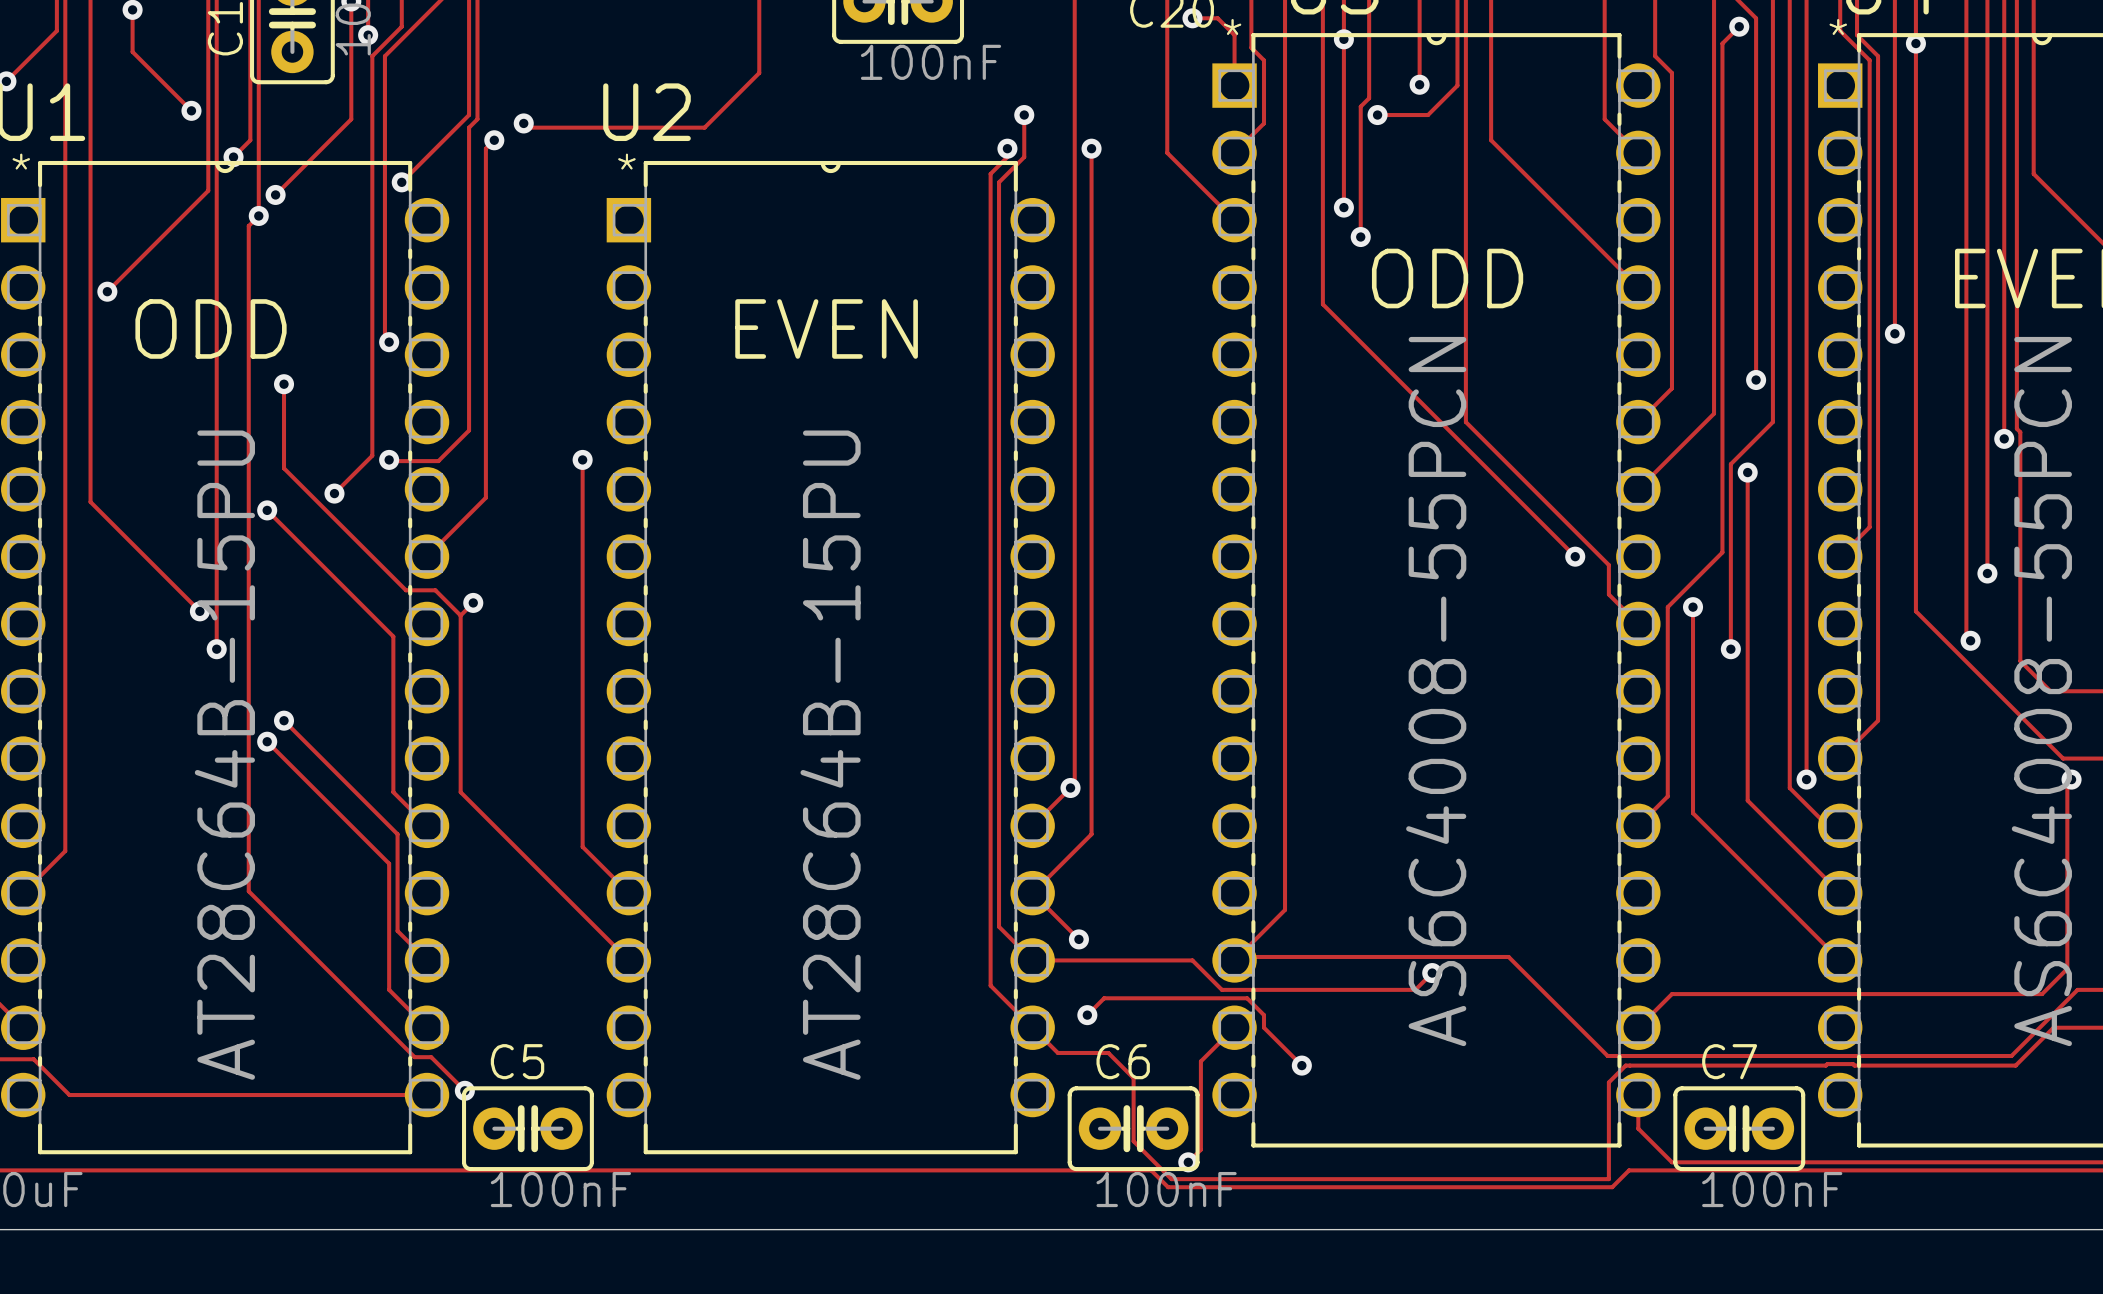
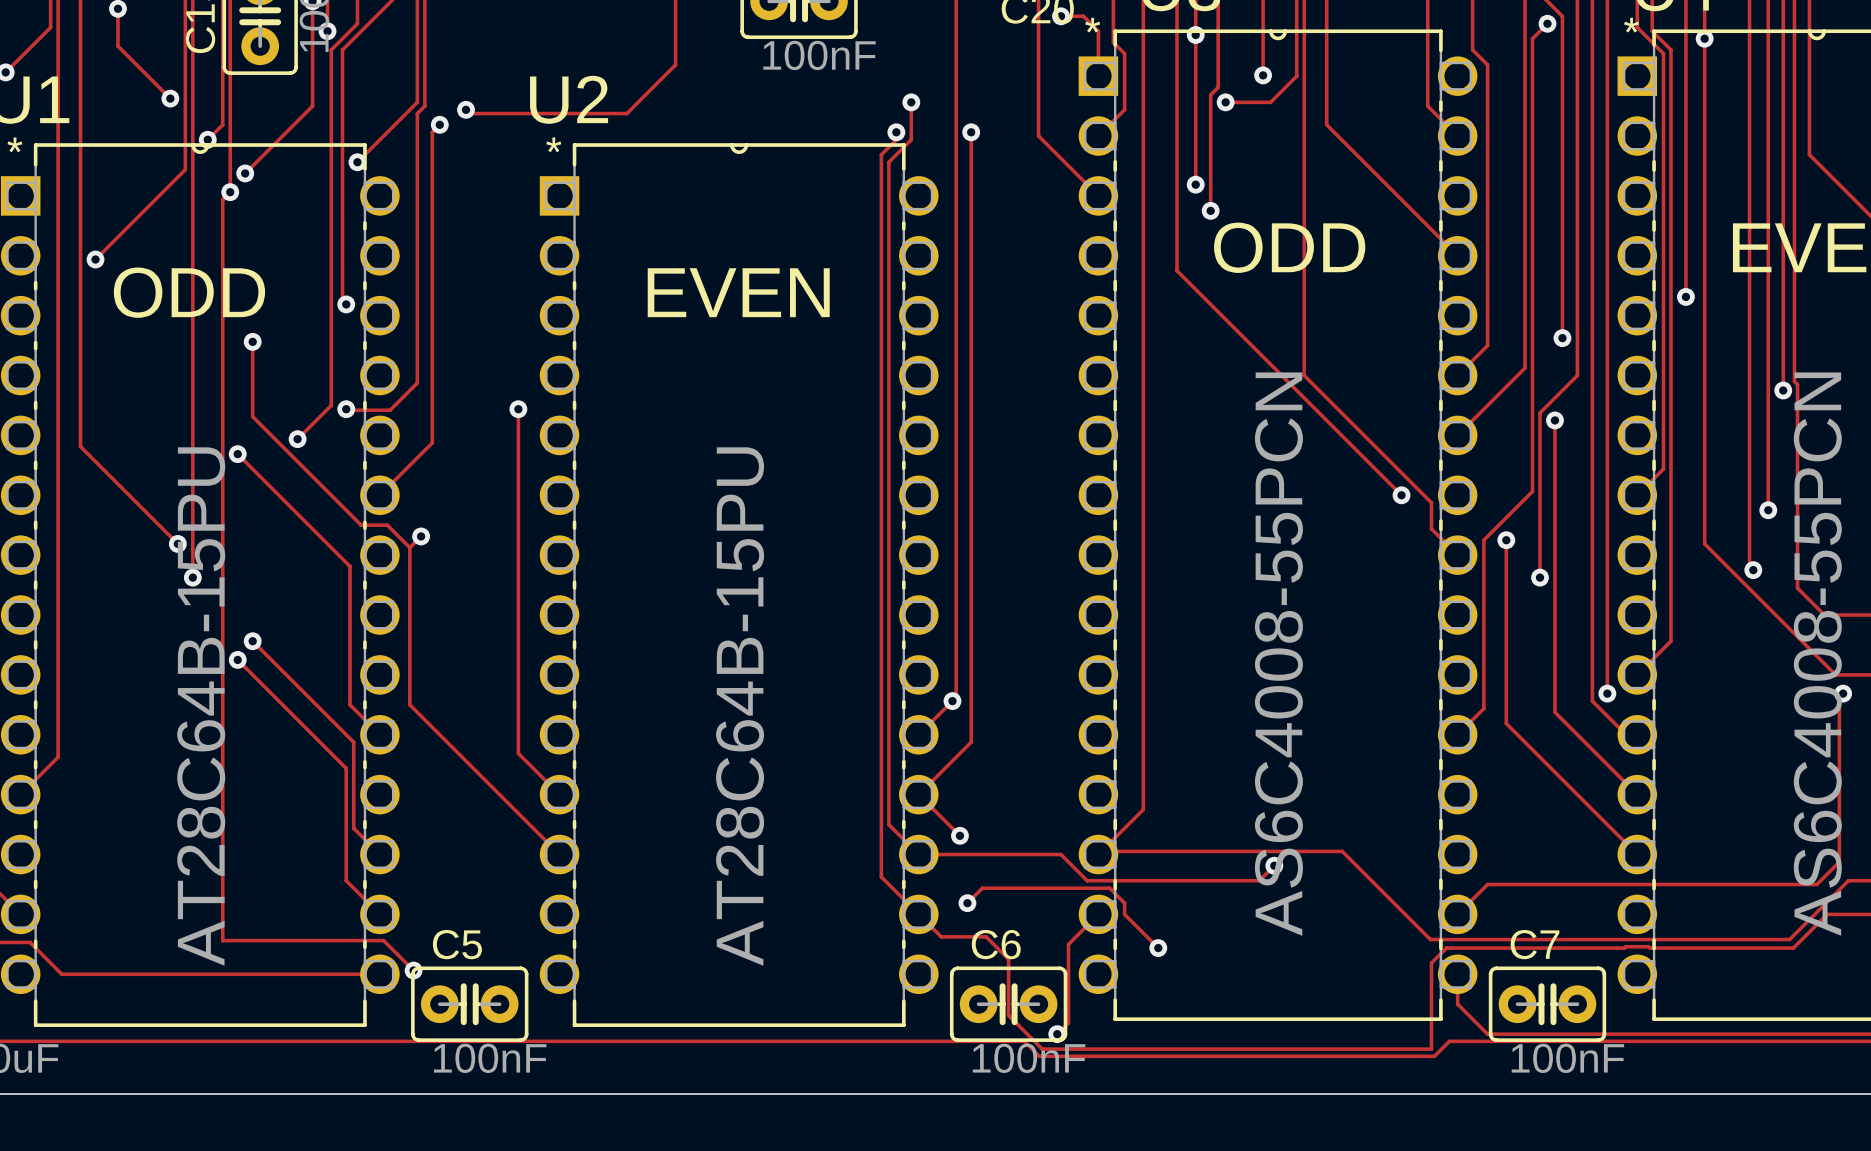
track: (250, 224) (248, 226) (248, 891) (414, 1057) -> (222, 199) (222, 940) (368, 940)

